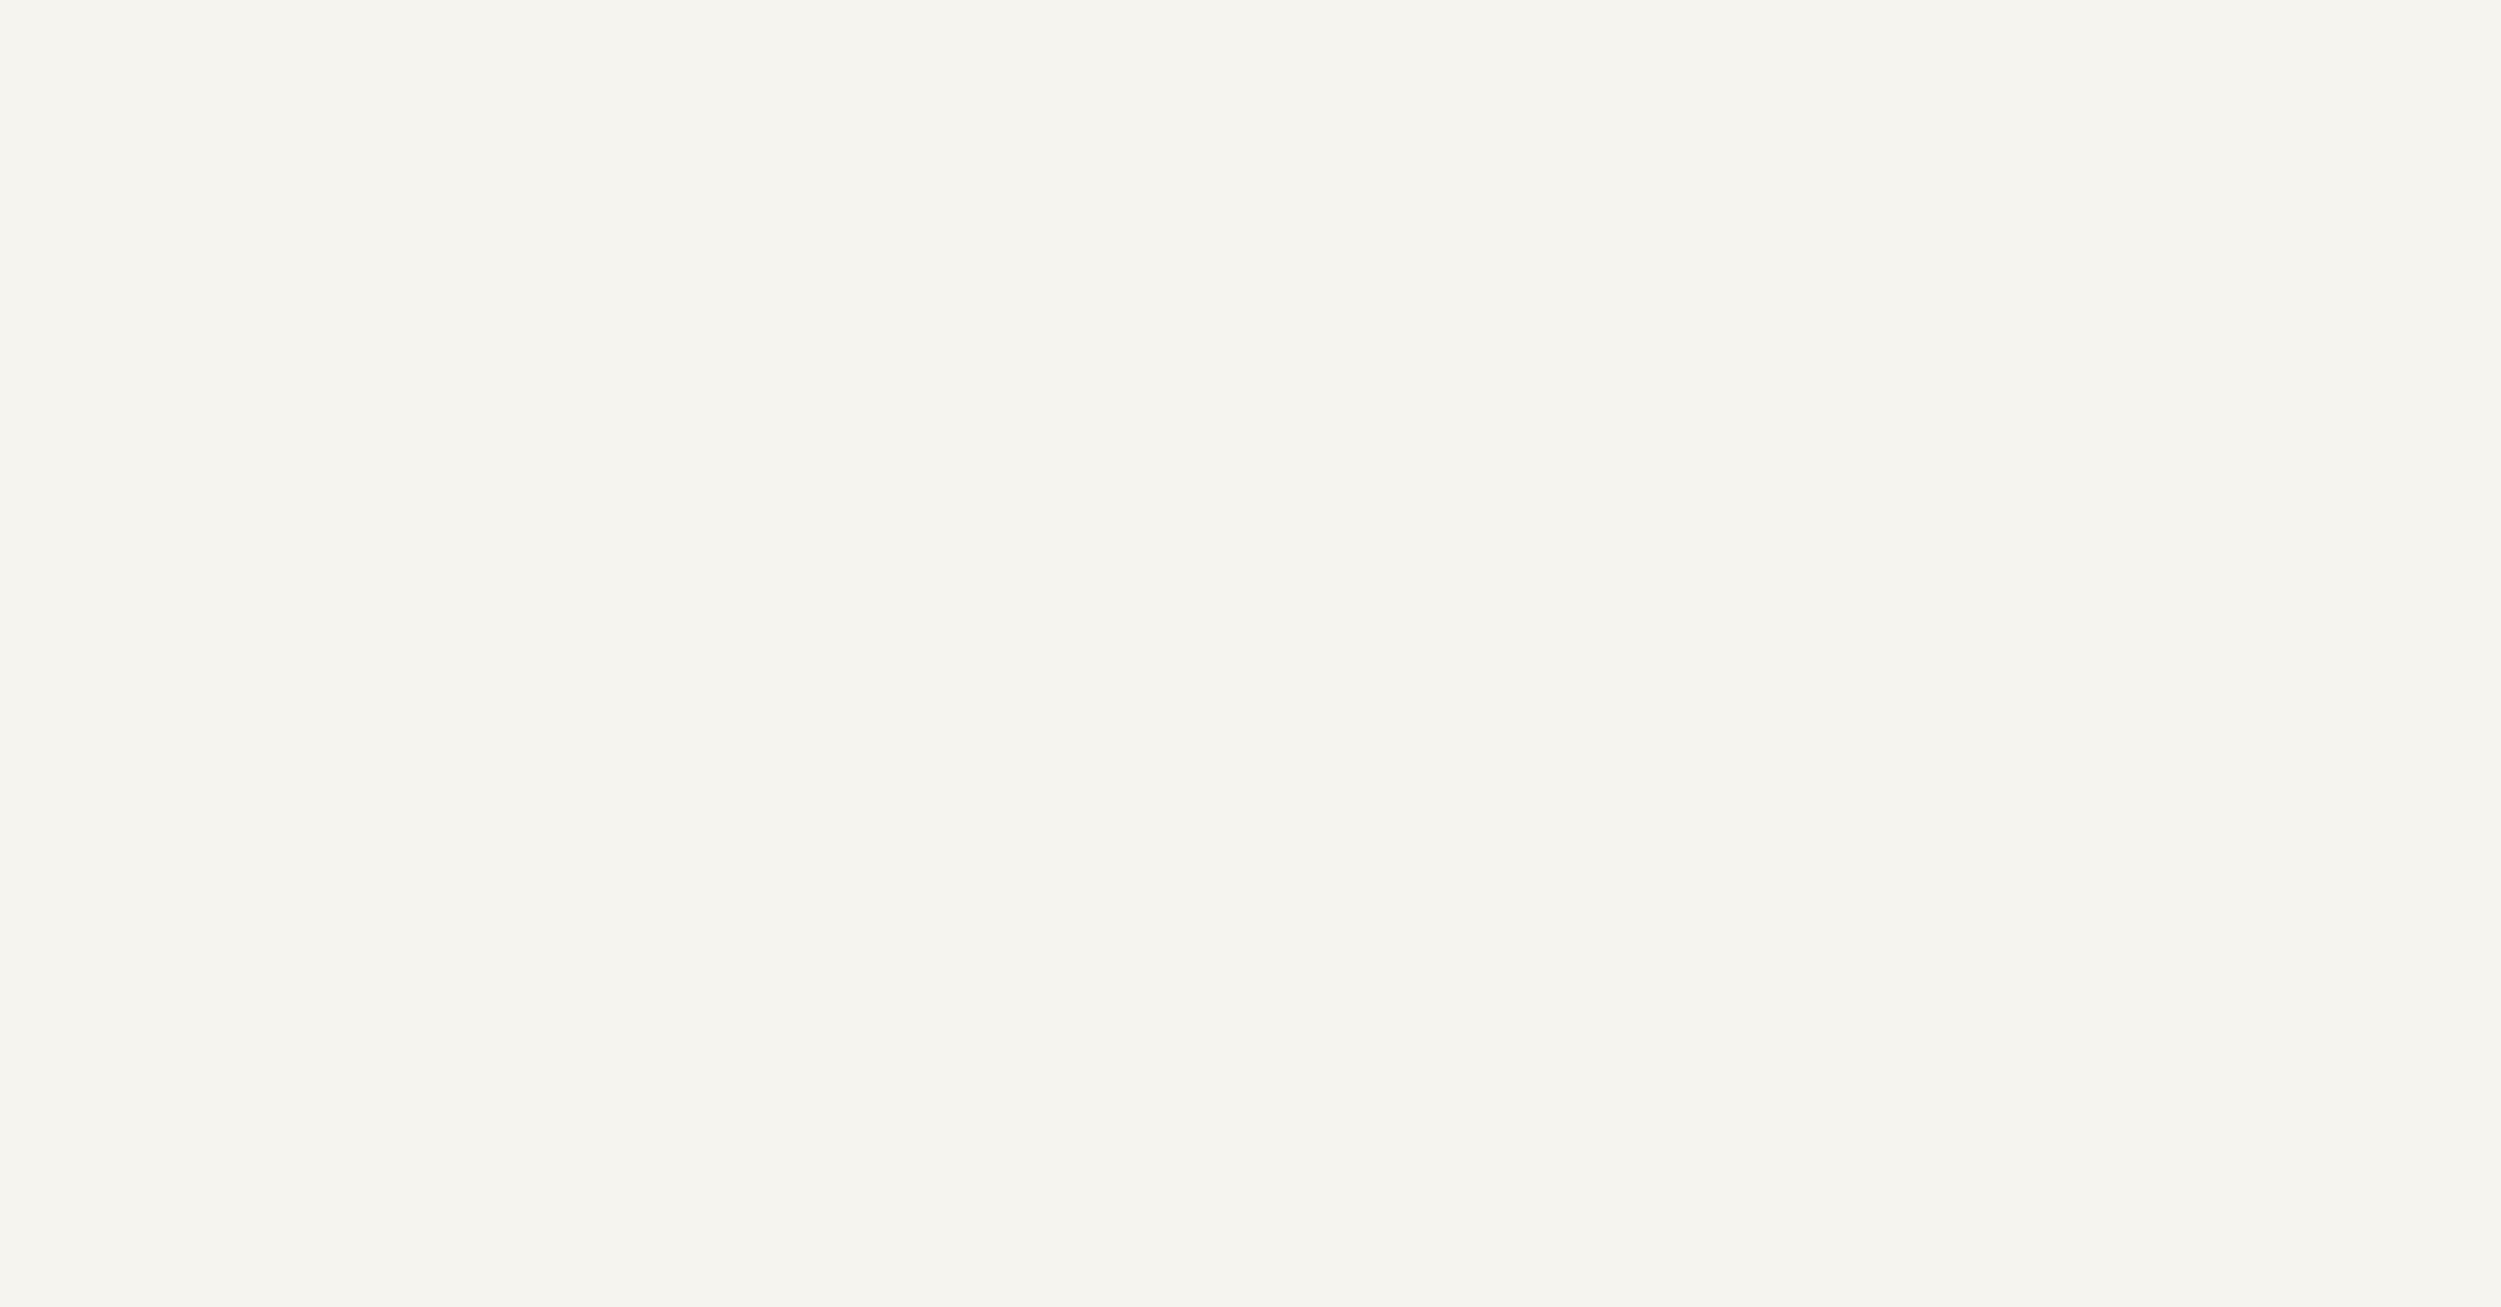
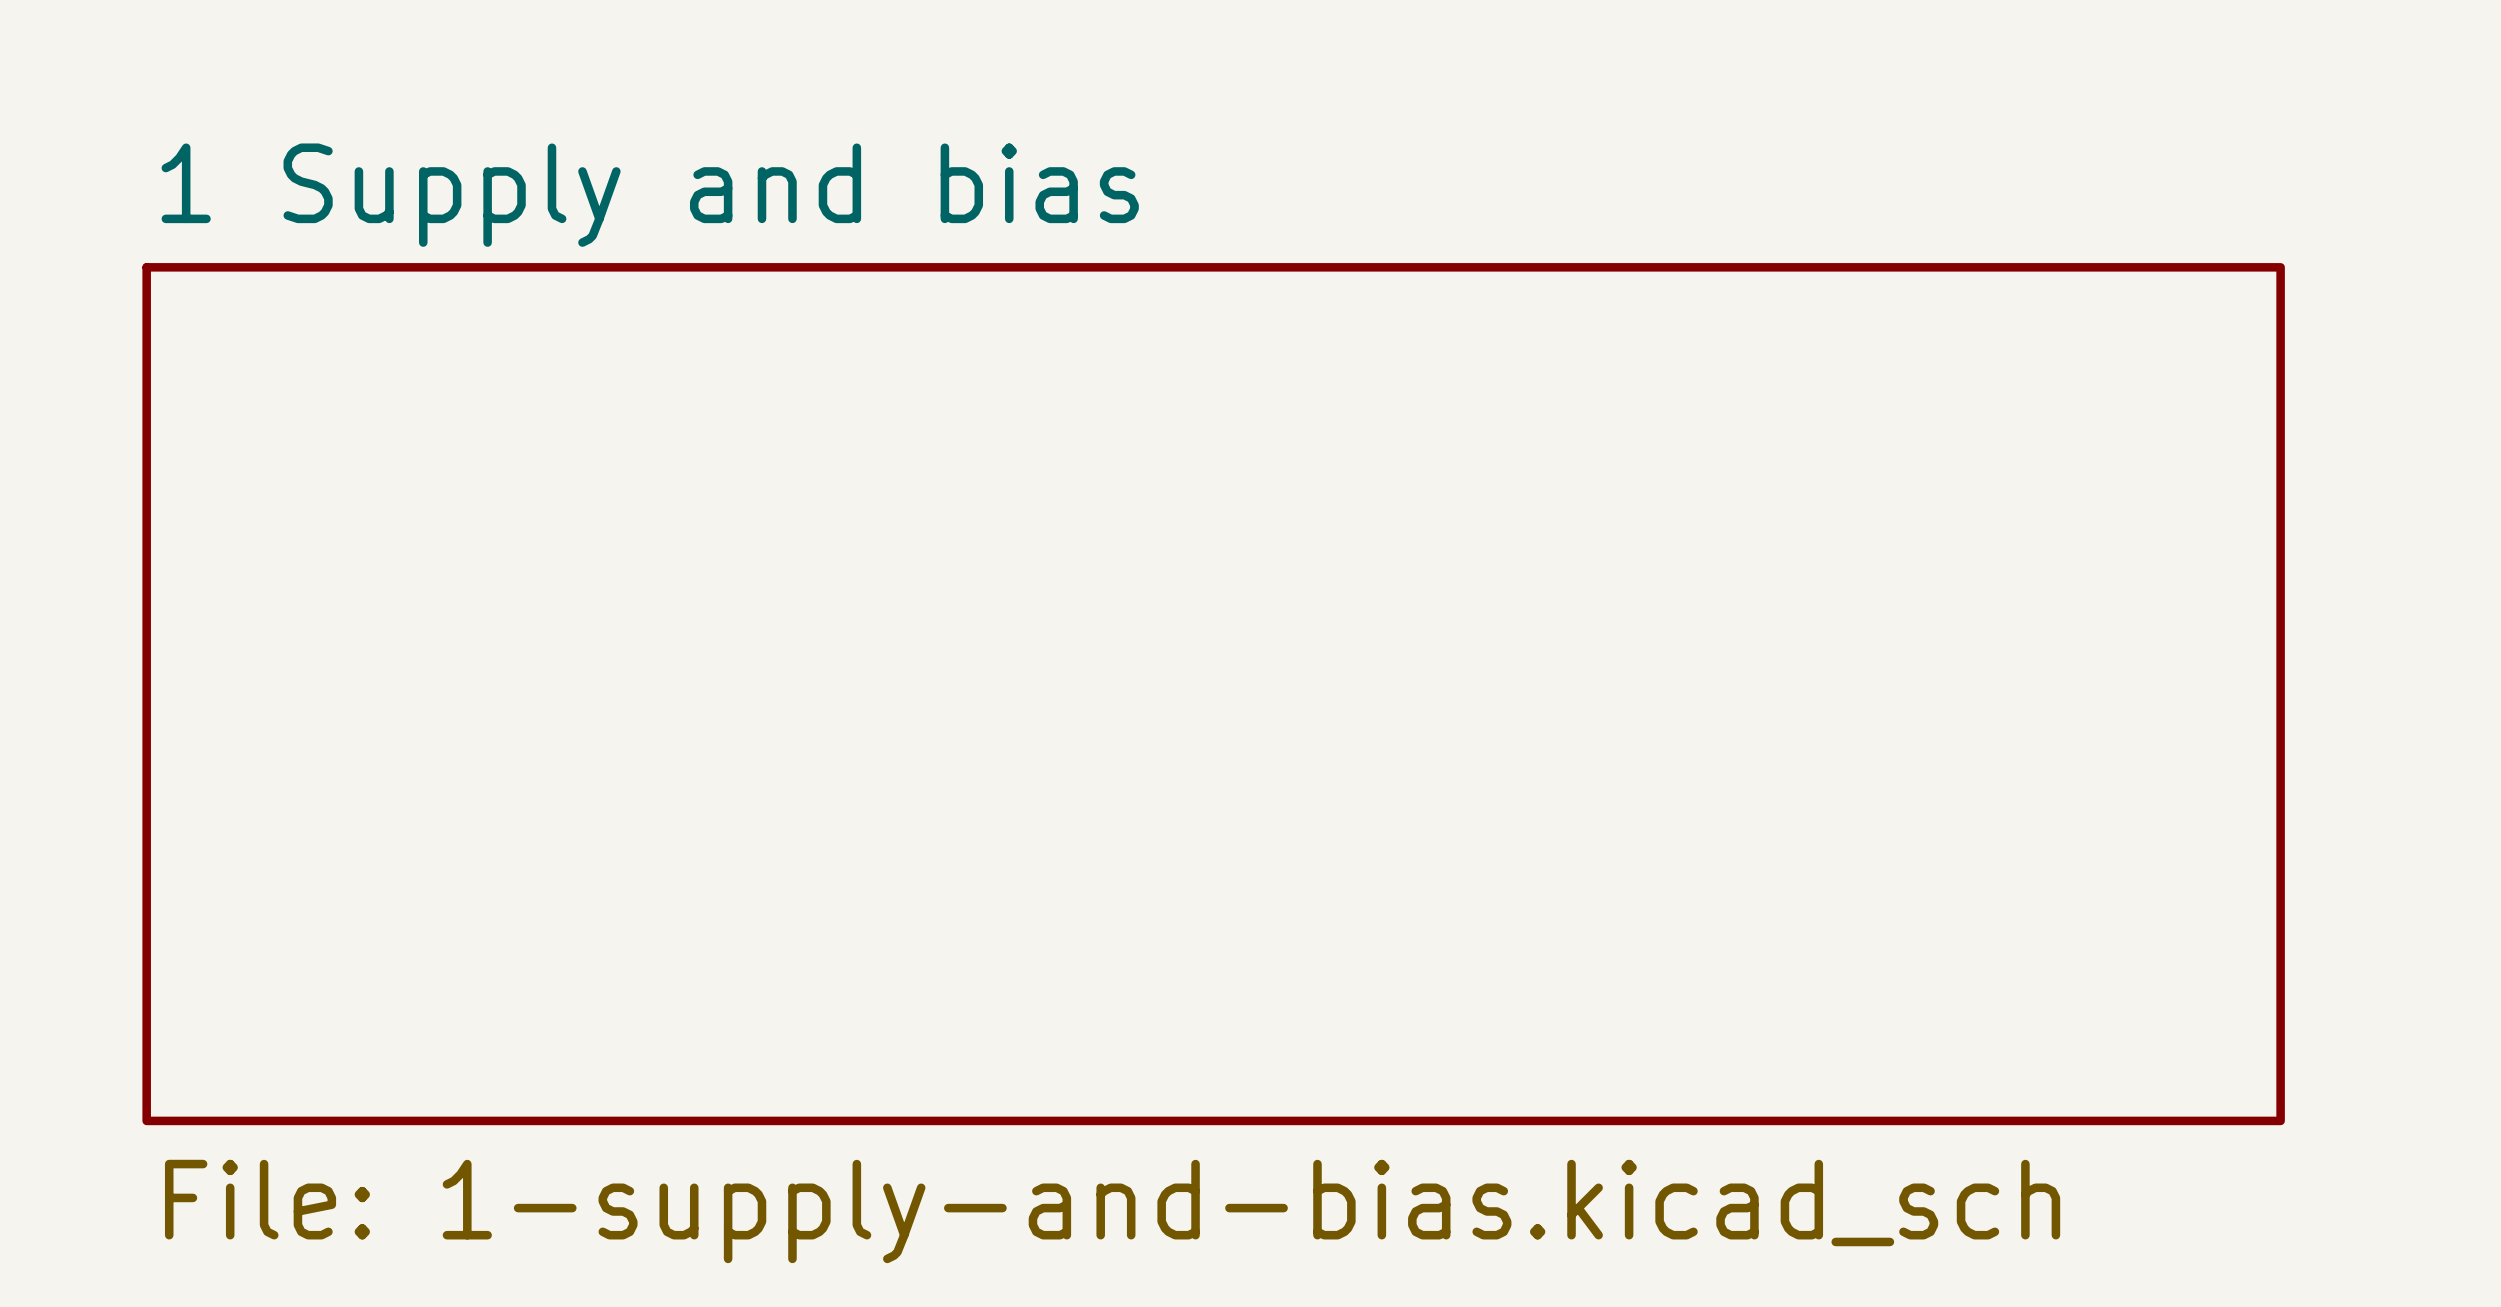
sheet 1 Supply and bias: none -> File: 1-supply-and-bias.kicad_sch (1213, 694)

